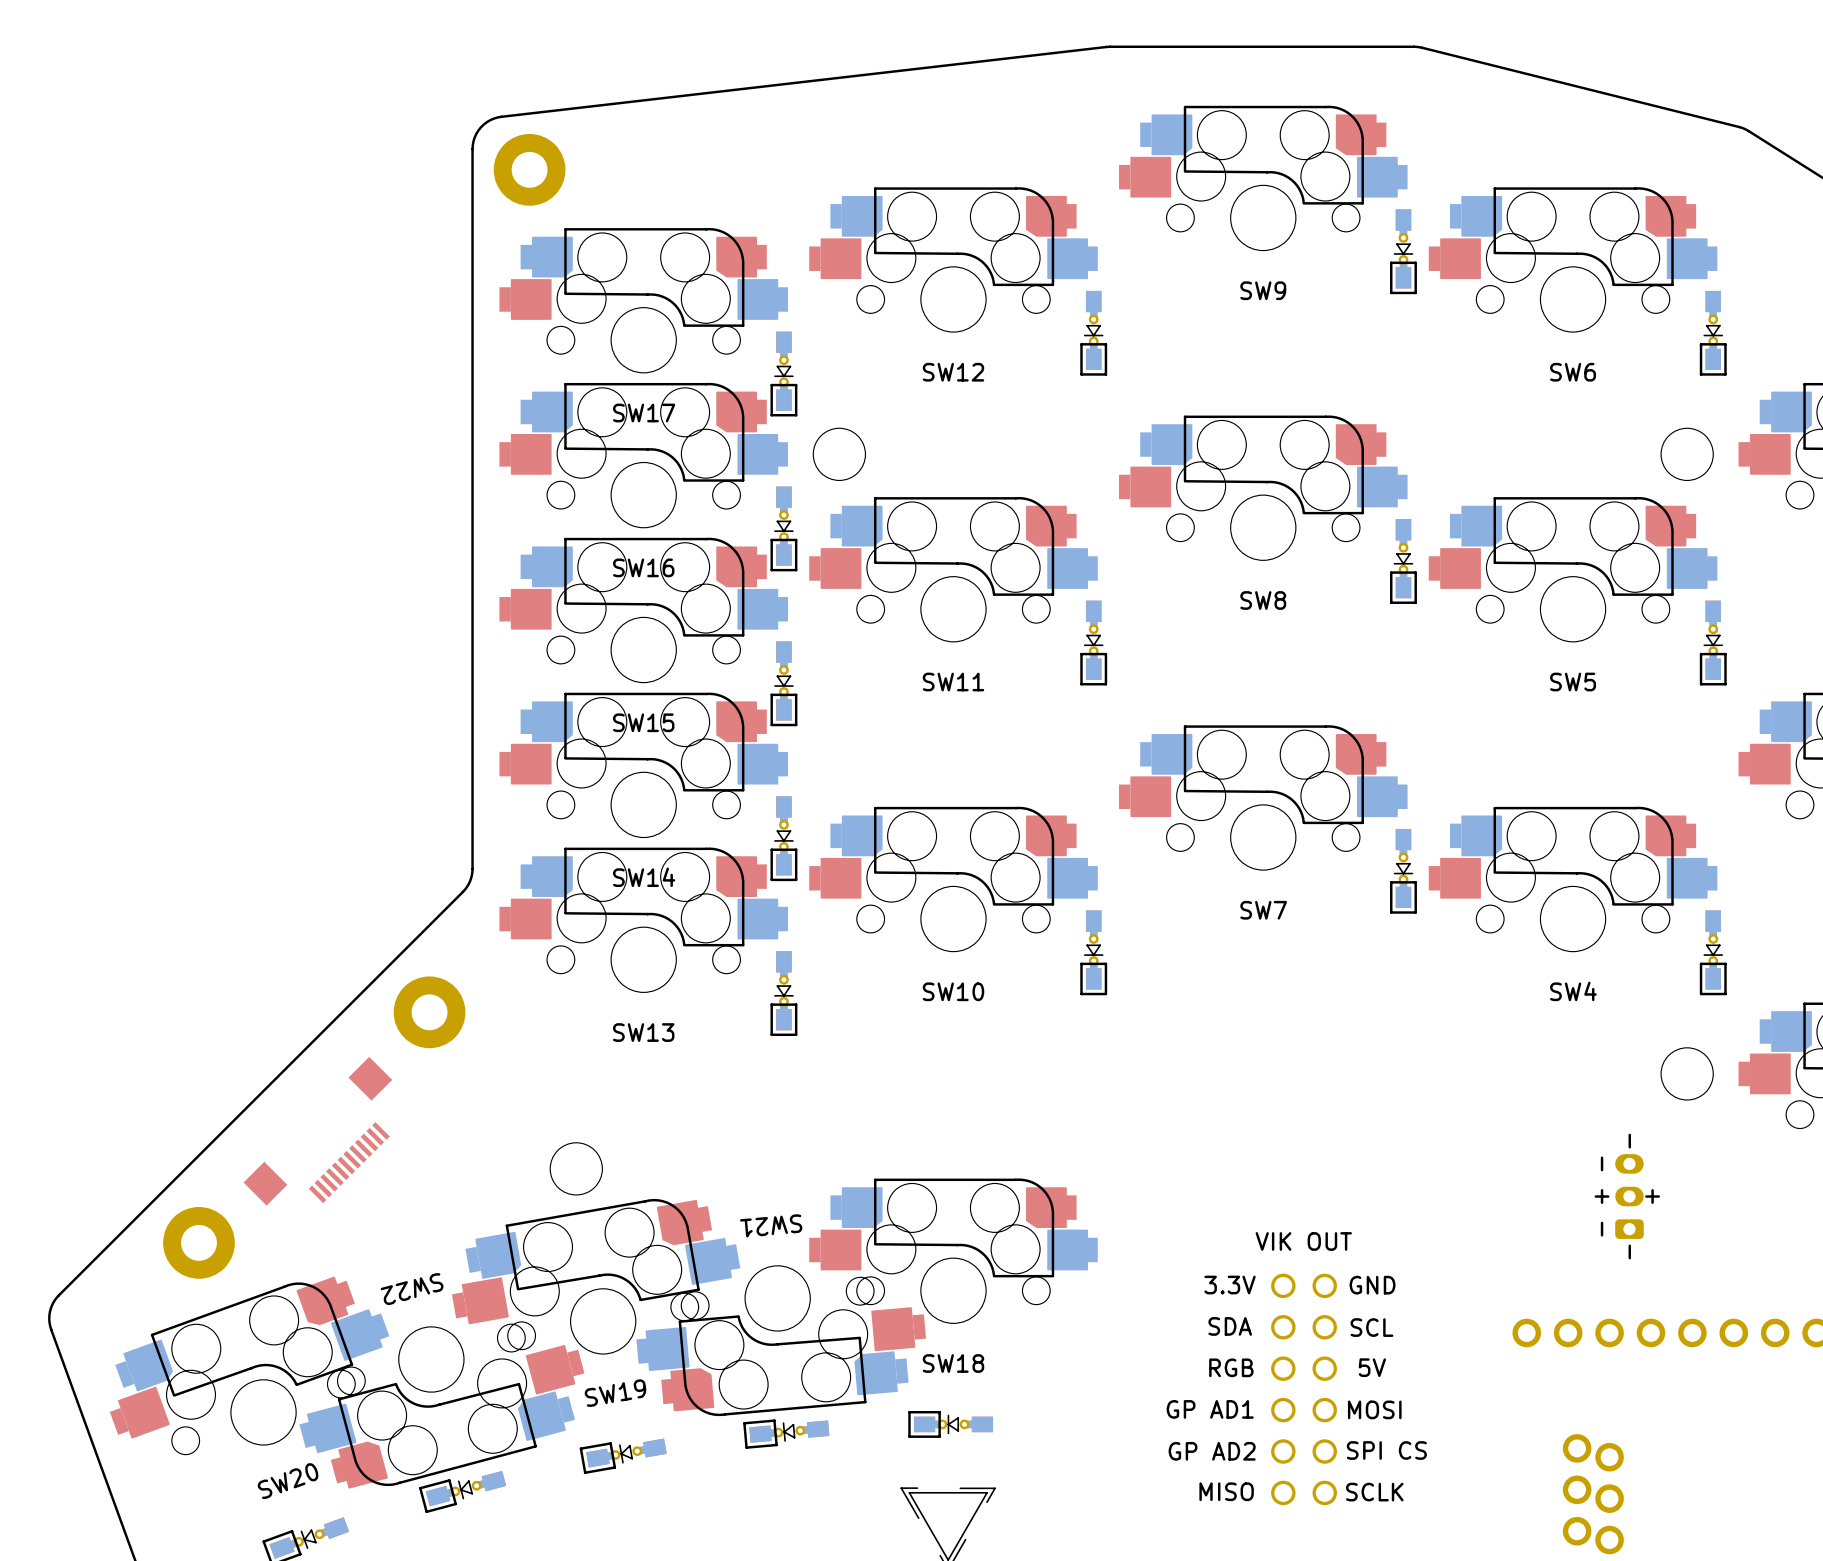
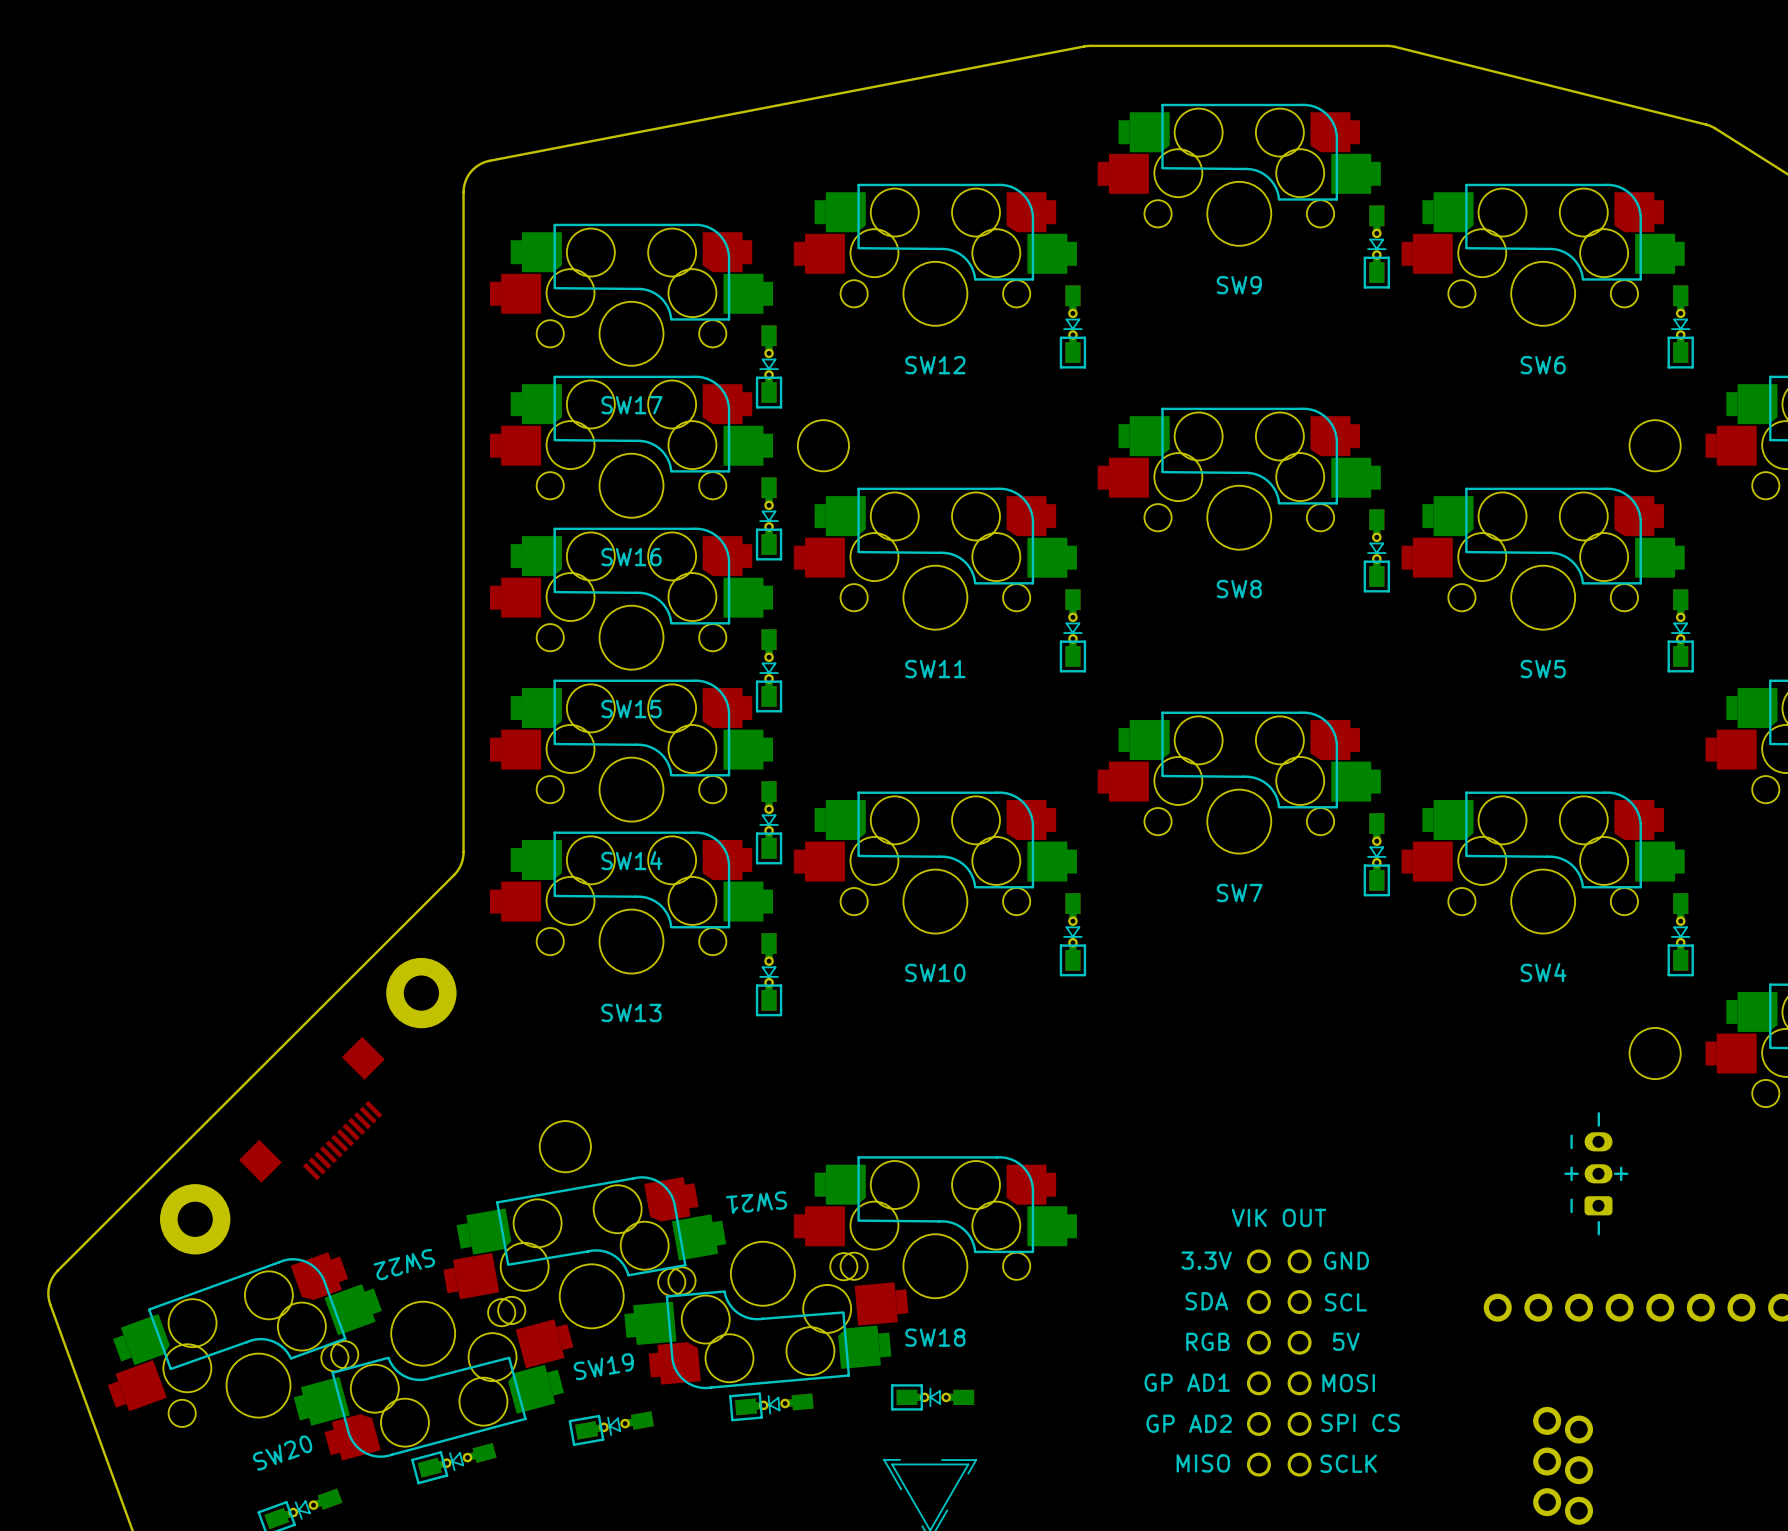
board edge: (1111, 46) (497, 117) (483, 124) (474, 137) (472, 149) (472, 195) -> (1090, 45) (489, 160) (479, 164) (470, 171) (465, 181) (463, 192)
part: (529, 169) -> none

